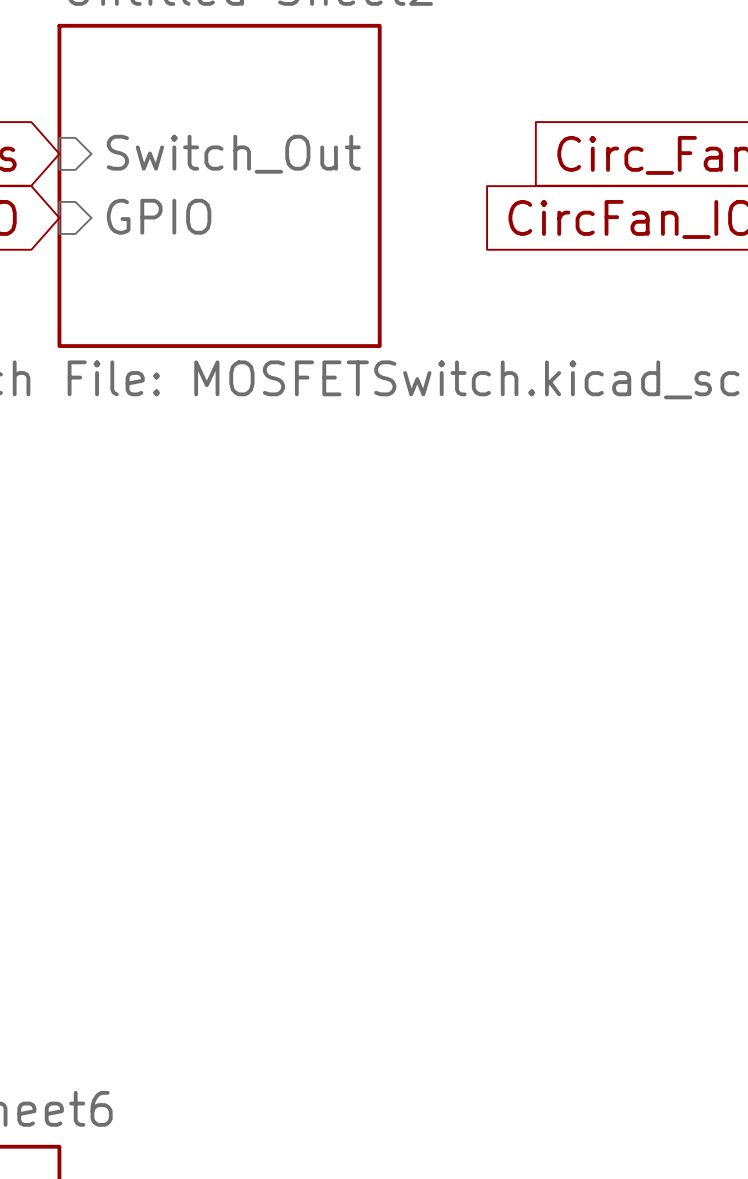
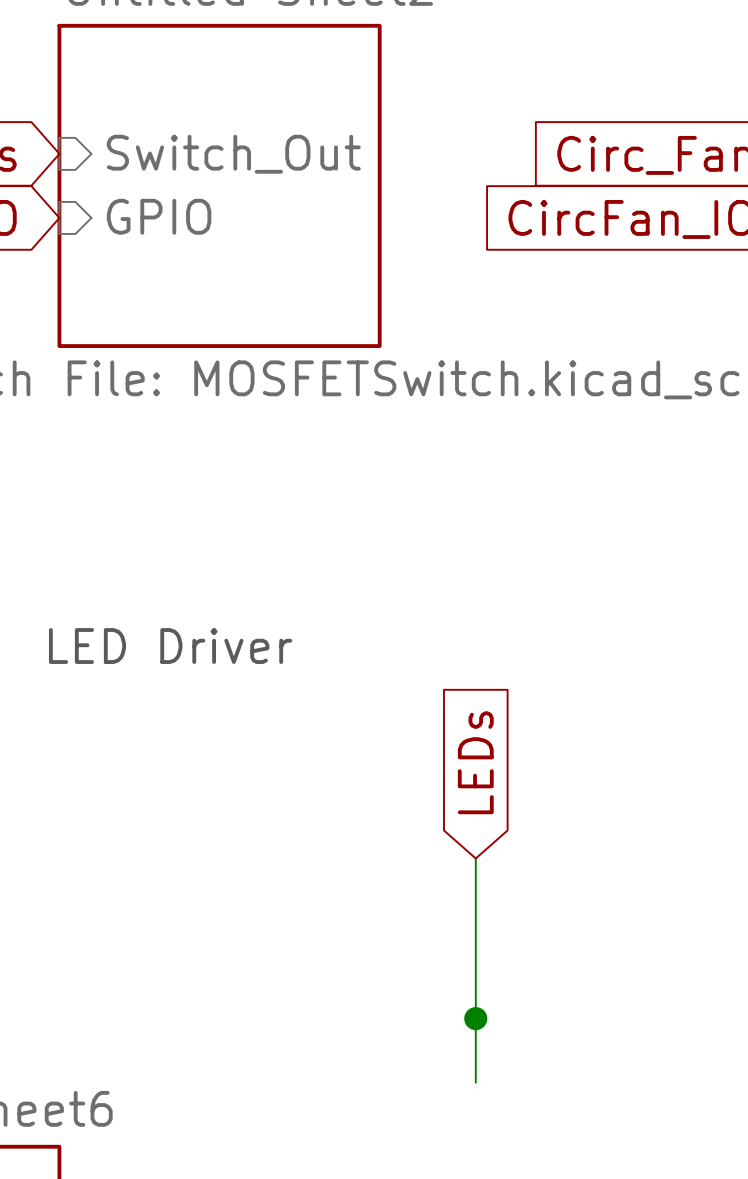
text: none -> LED Driver (170, 646)
global label: none -> LEDs (475, 762)
wire: none -> (475, 858) (475, 1082)
junction: none -> (475, 1018)

